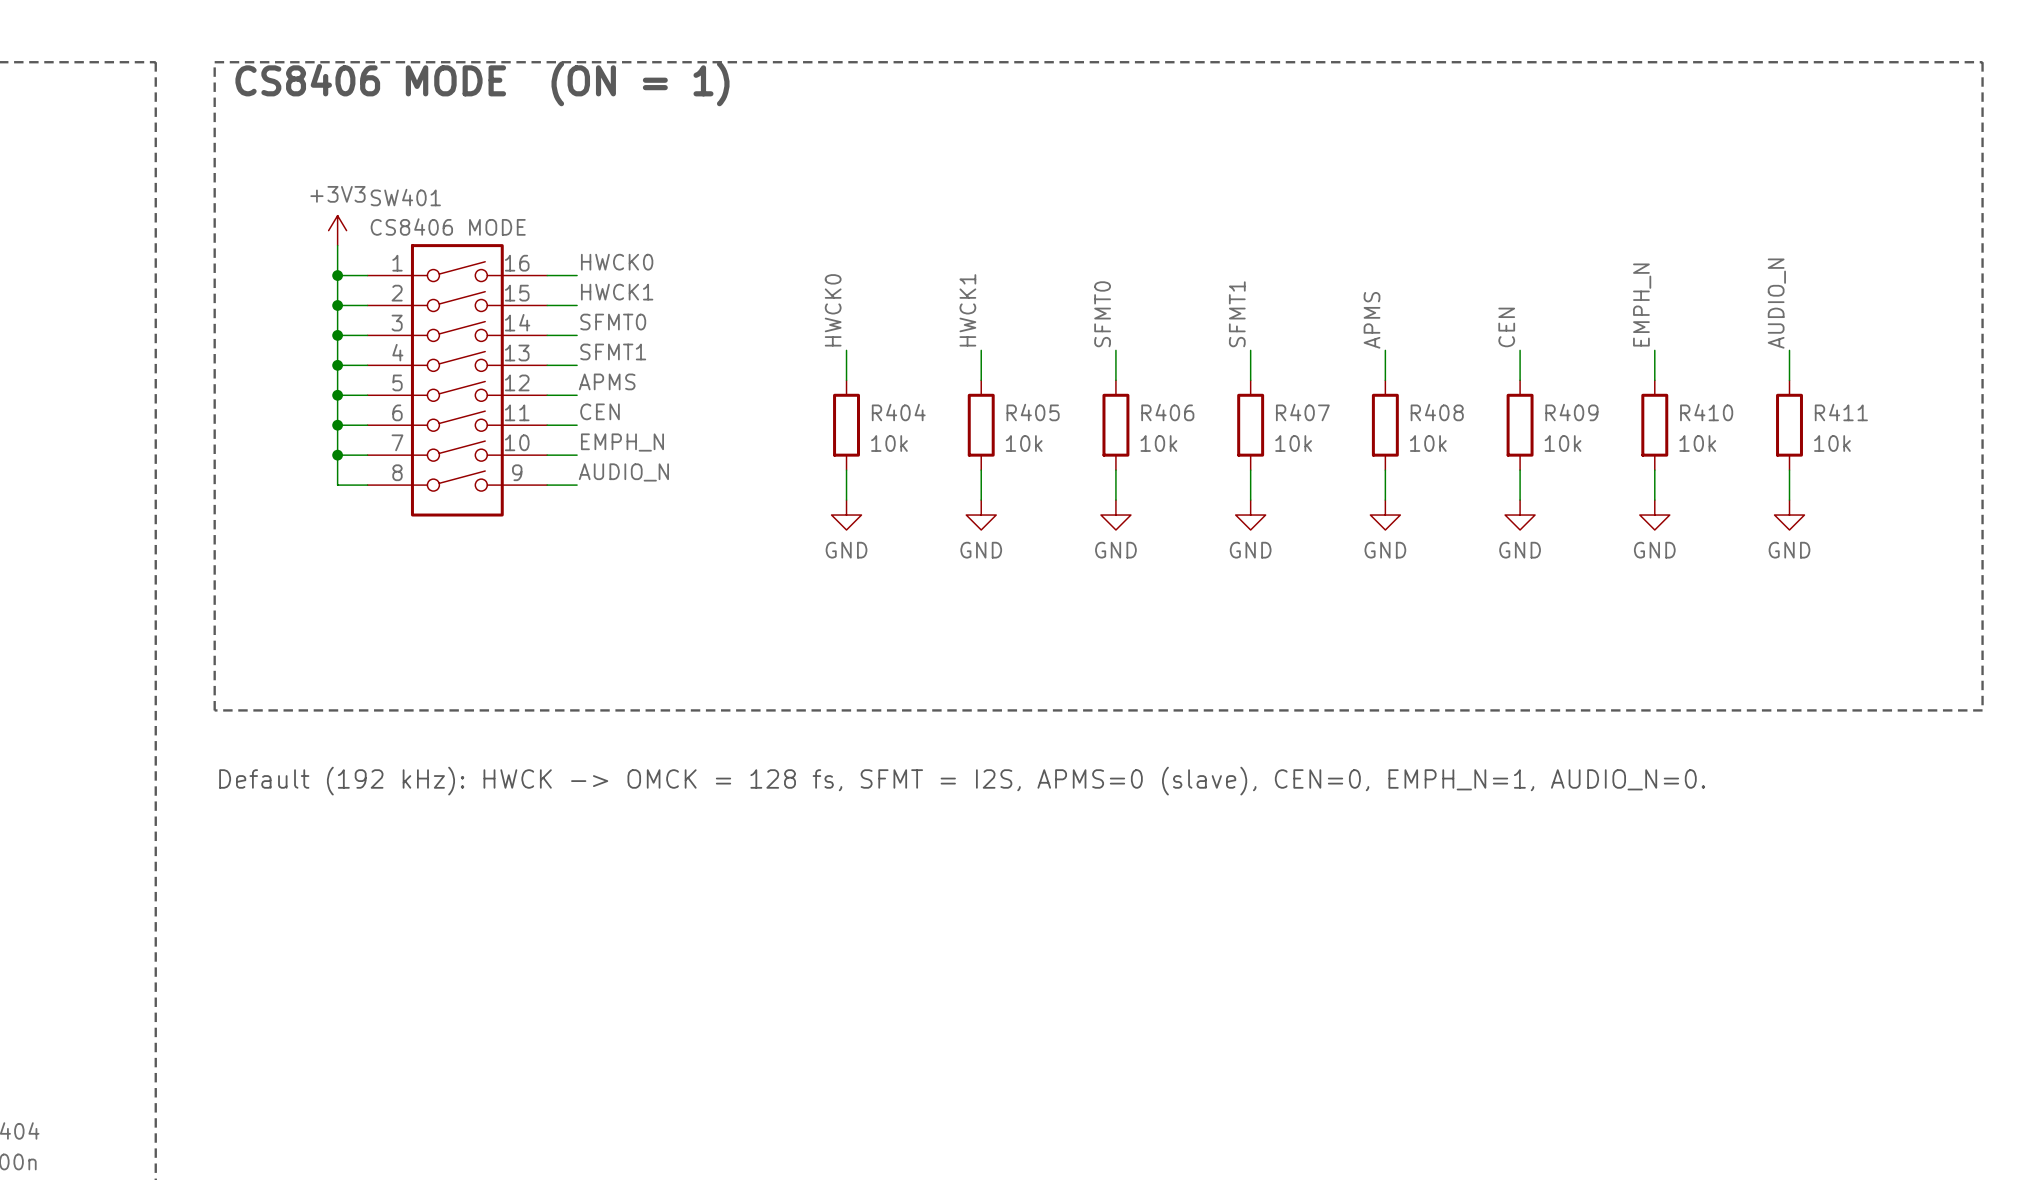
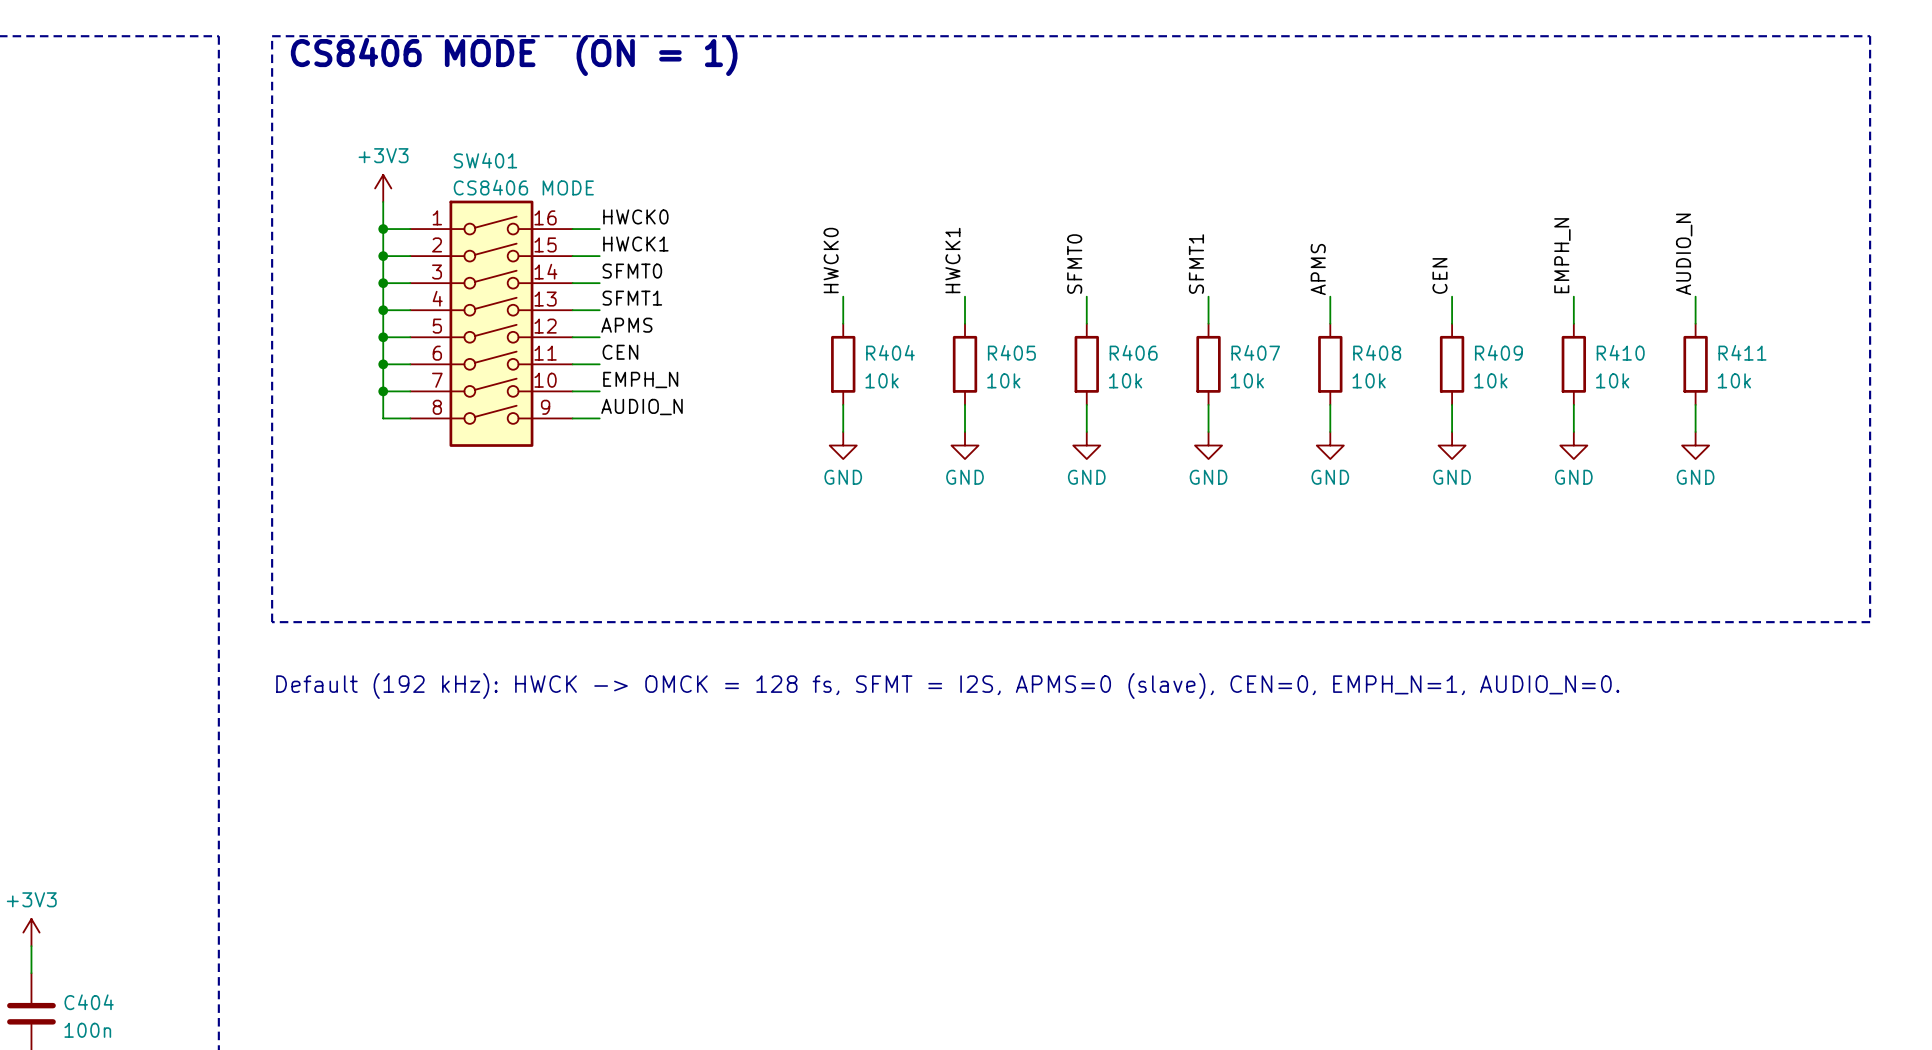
SW401 name position: SW401 (405, 197) -> SW401 (485, 160)
SW401 value position: CS8406 MODE (448, 227) -> CS8406 MODE (523, 187)

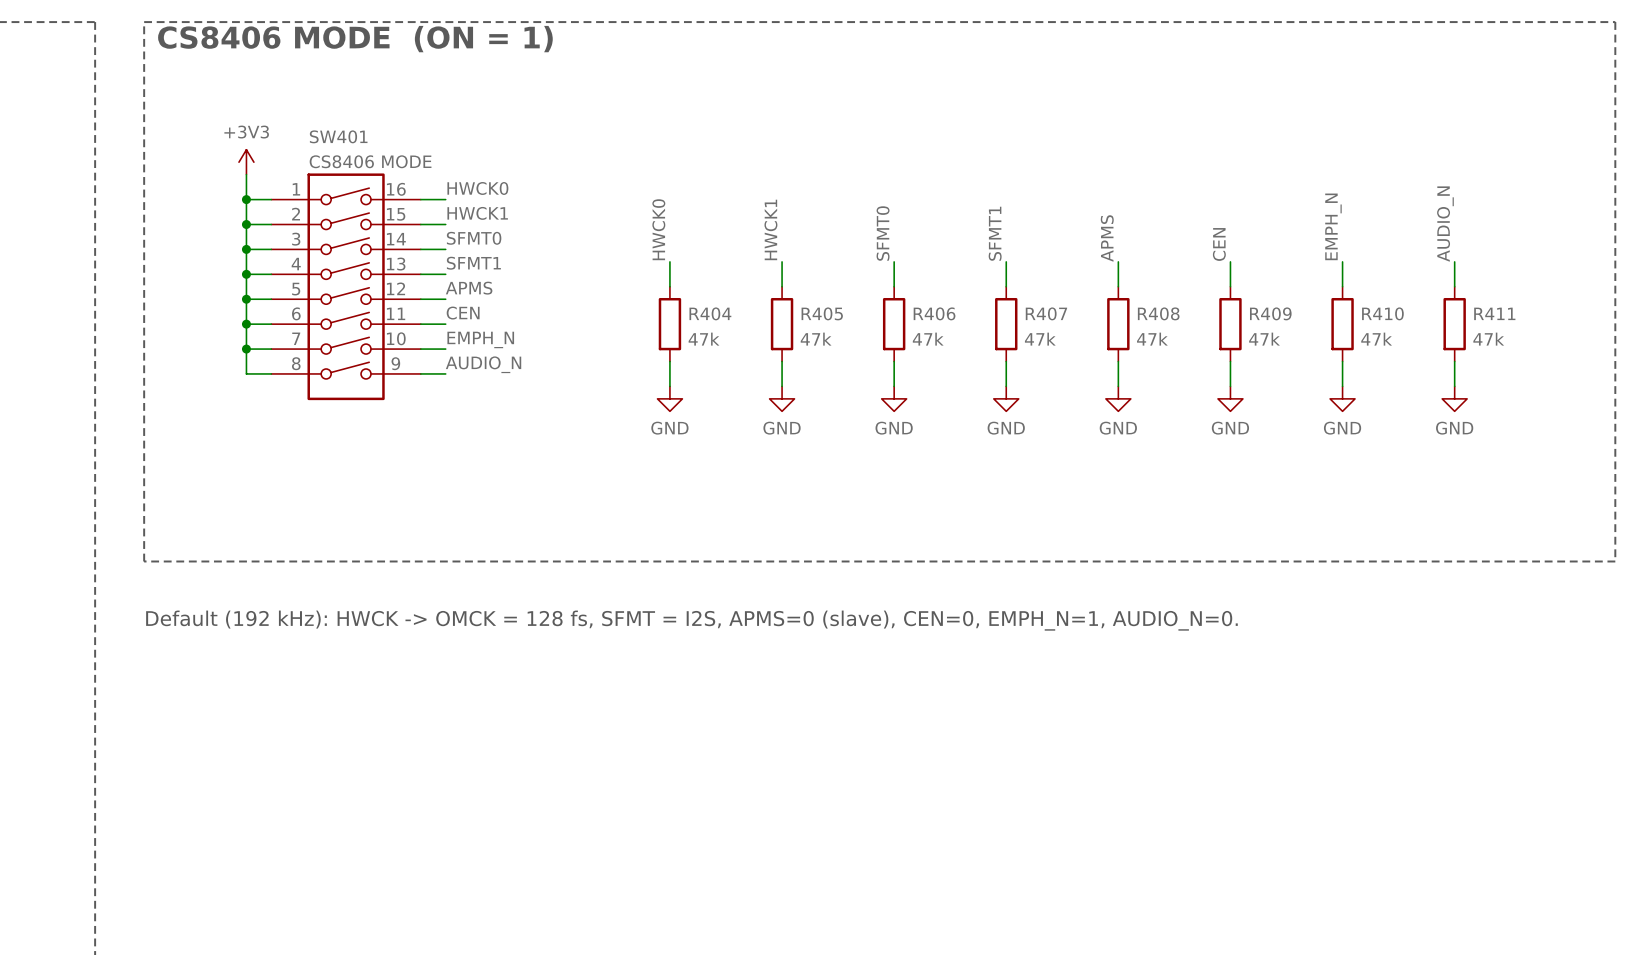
R404 value: 10k (882, 380) -> 47k (704, 339)
R405 value: 10k (1003, 380) -> 47k (816, 339)
R406 value: 10k (1125, 380) -> 47k (928, 339)
R407 value: 10k (1247, 380) -> 47k (1040, 339)
R408 value: 10k (1369, 380) -> 47k (1152, 339)
R409 value: 10k (1490, 380) -> 47k (1264, 339)
R410 value: 10k (1612, 380) -> 47k (1376, 339)
R411 value: 10k (1734, 380) -> 47k (1488, 339)

